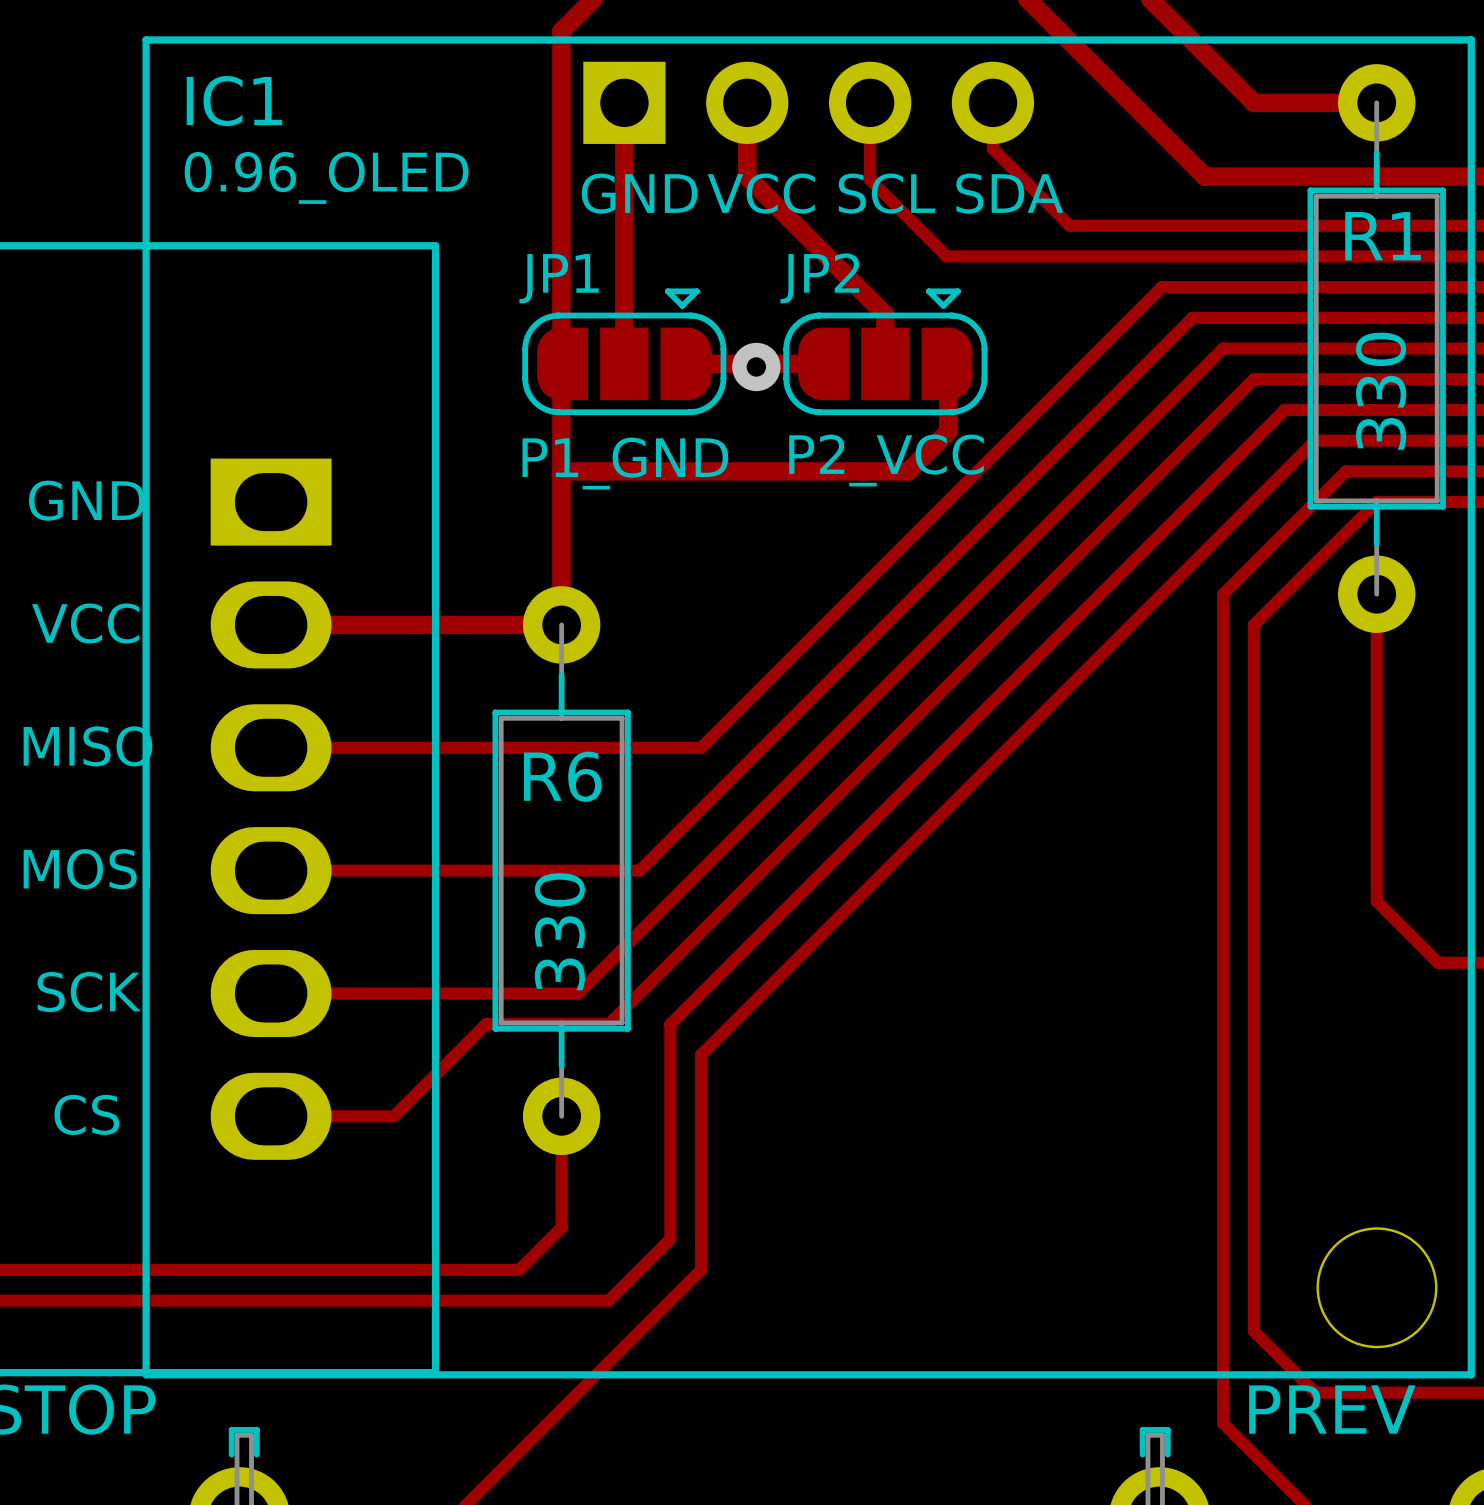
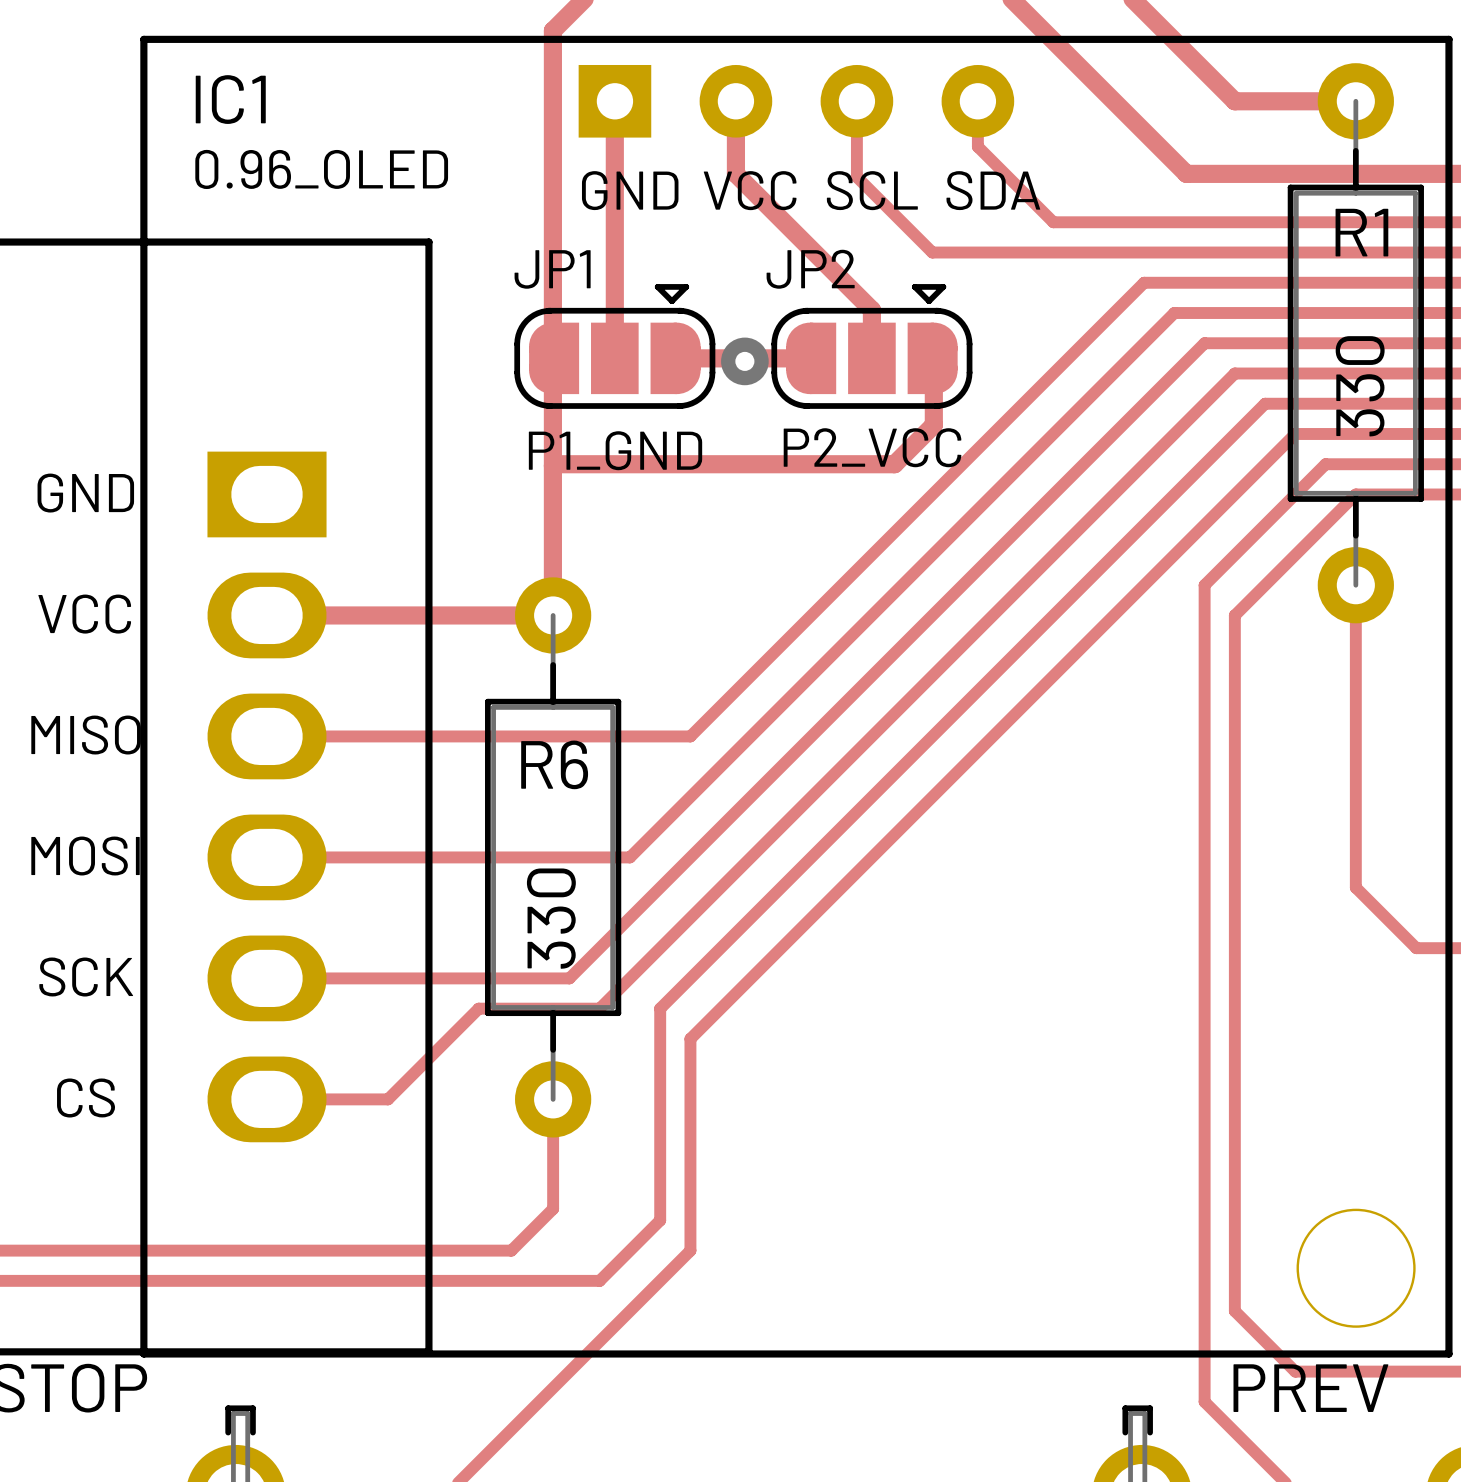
IC1 footprint: [142, 36, 1475, 1379] -> [140, 35, 1453, 1358]

